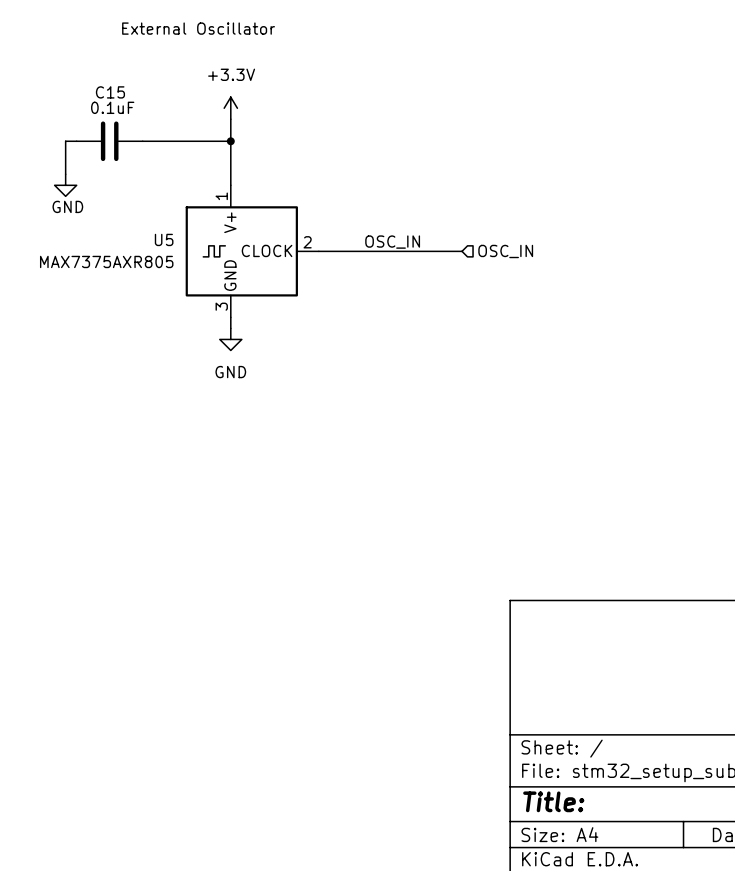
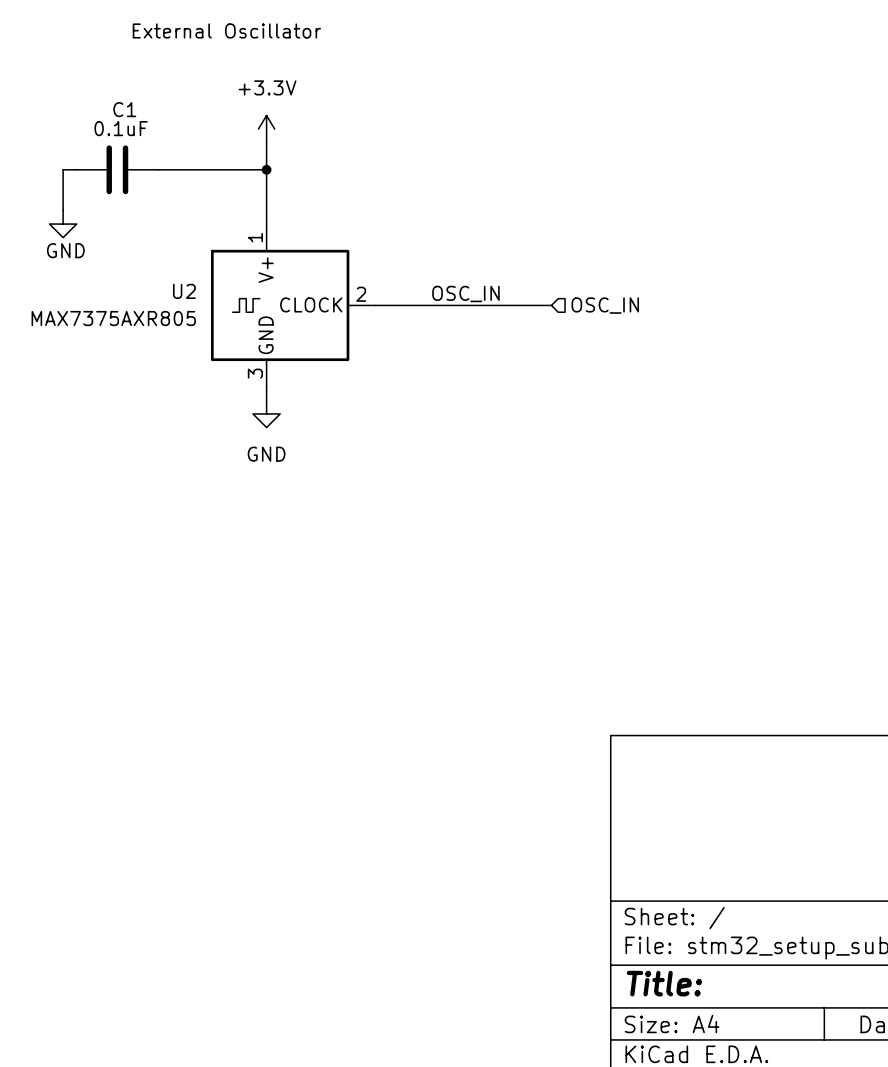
C15 name: C15 (110, 92) -> C1 (124, 109)
U5 name: U5 (164, 239) -> U2 (184, 291)

